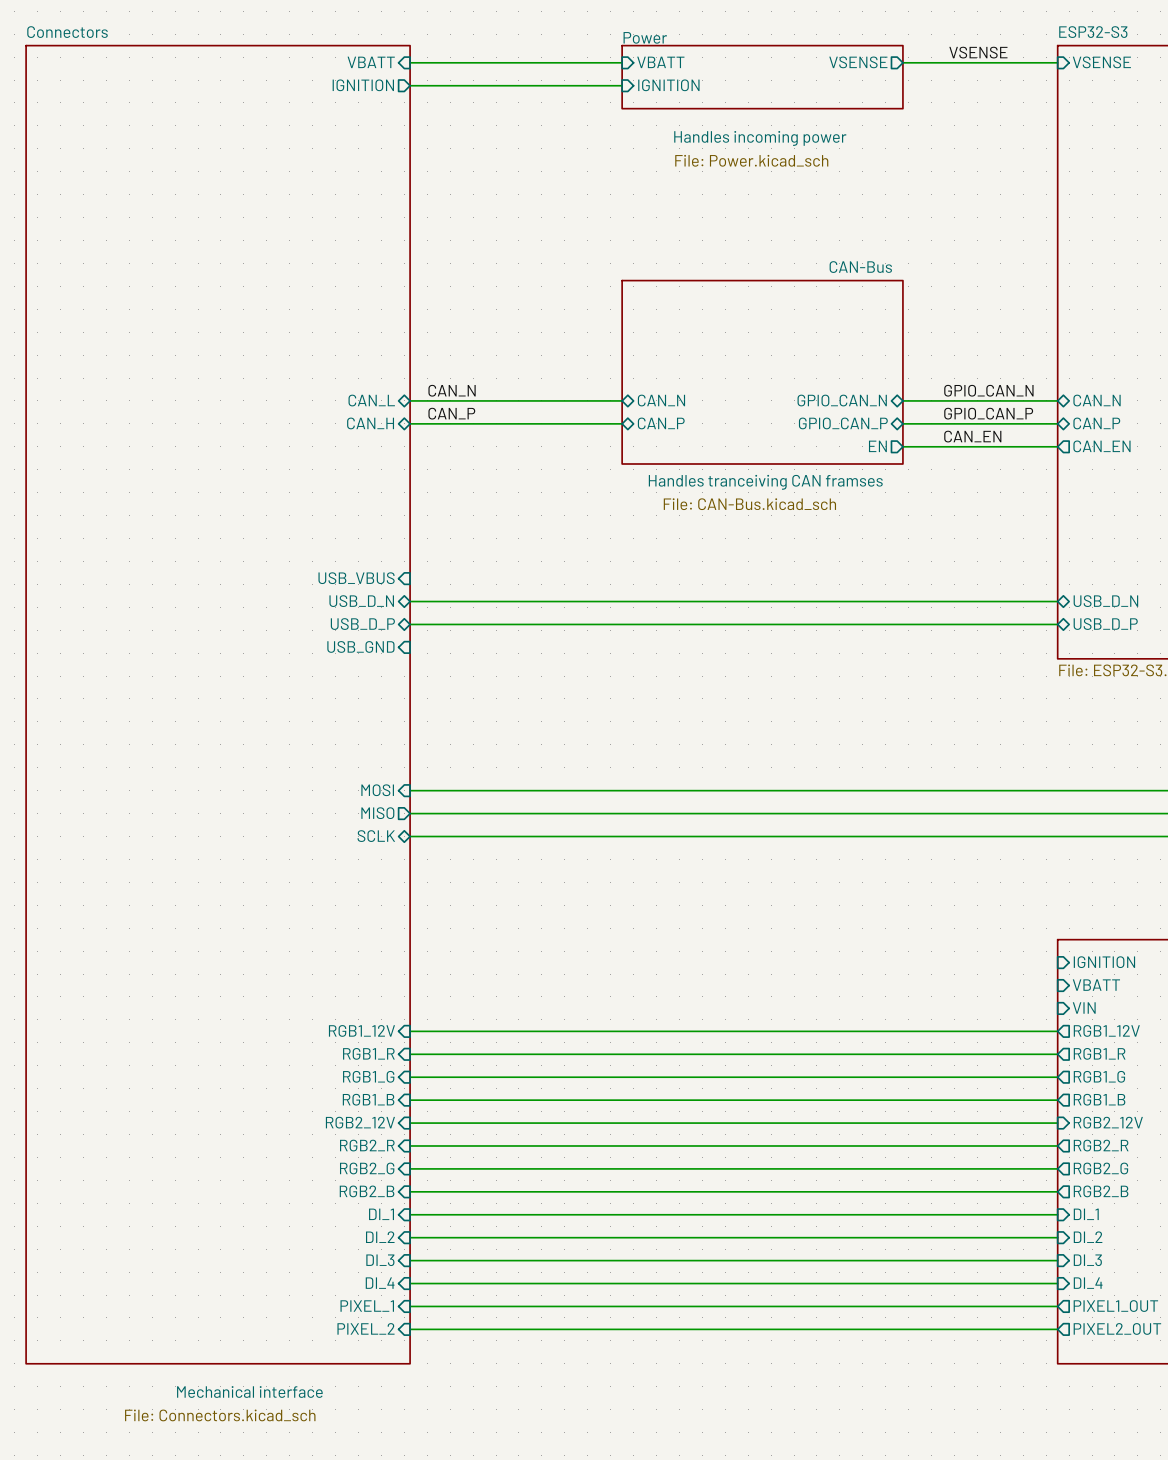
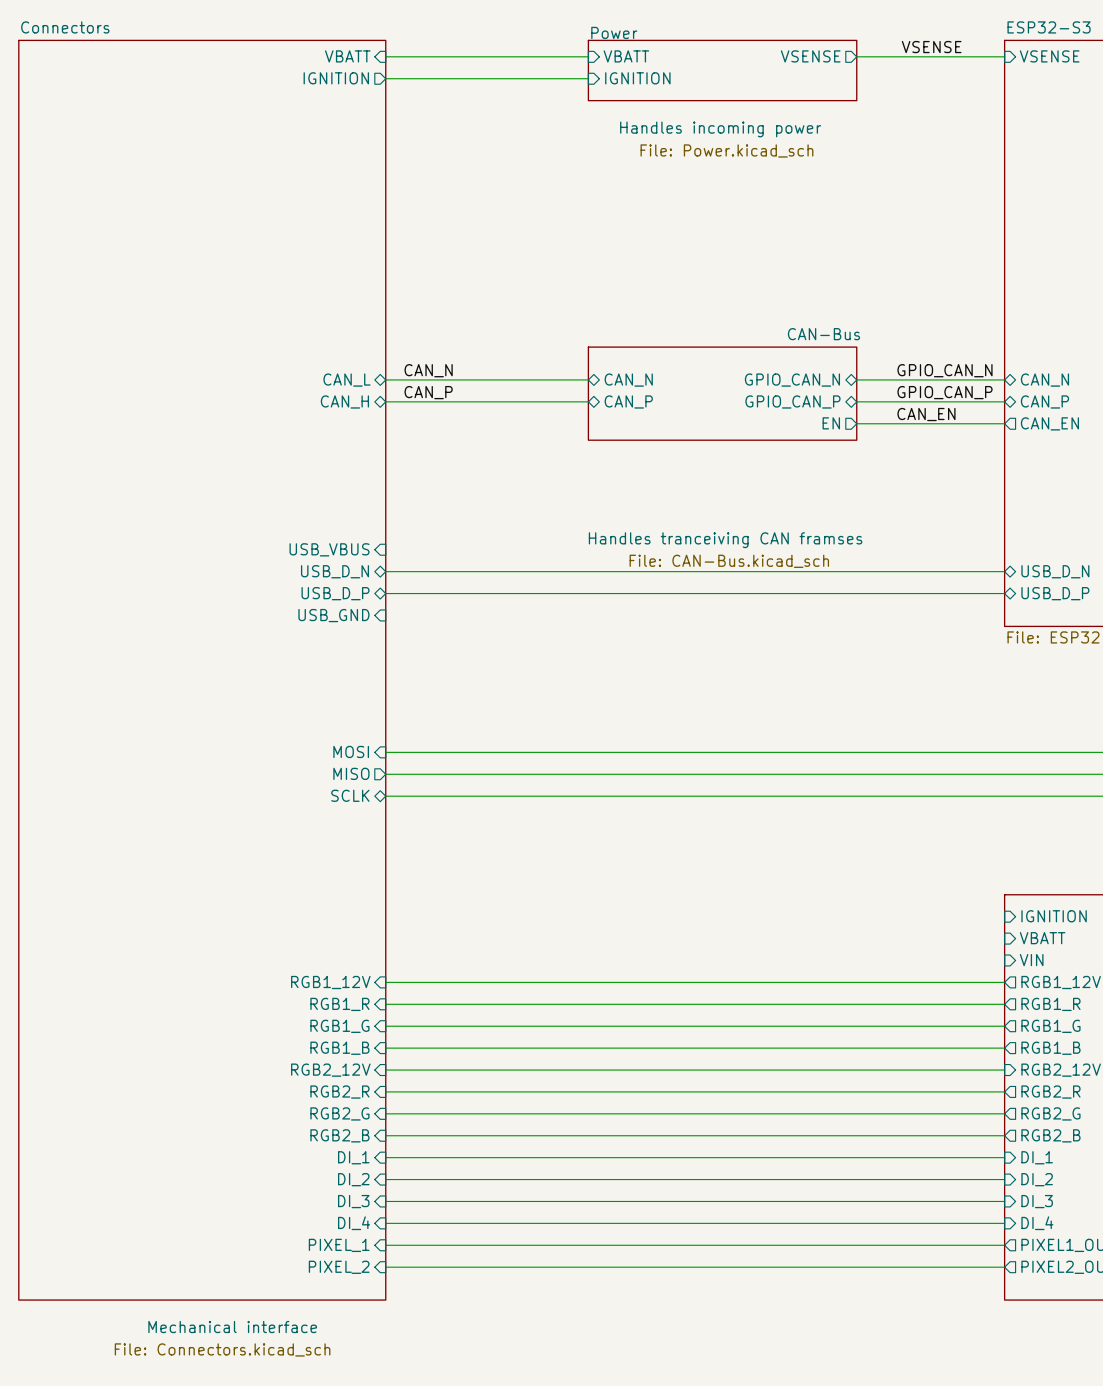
sheet CAN-Bus: File: CAN-Bus.kicad_sch (762, 372) -> none
sheet CAN-Bus: none -> File: CAN-Bus.kicad_sch (722, 393)

